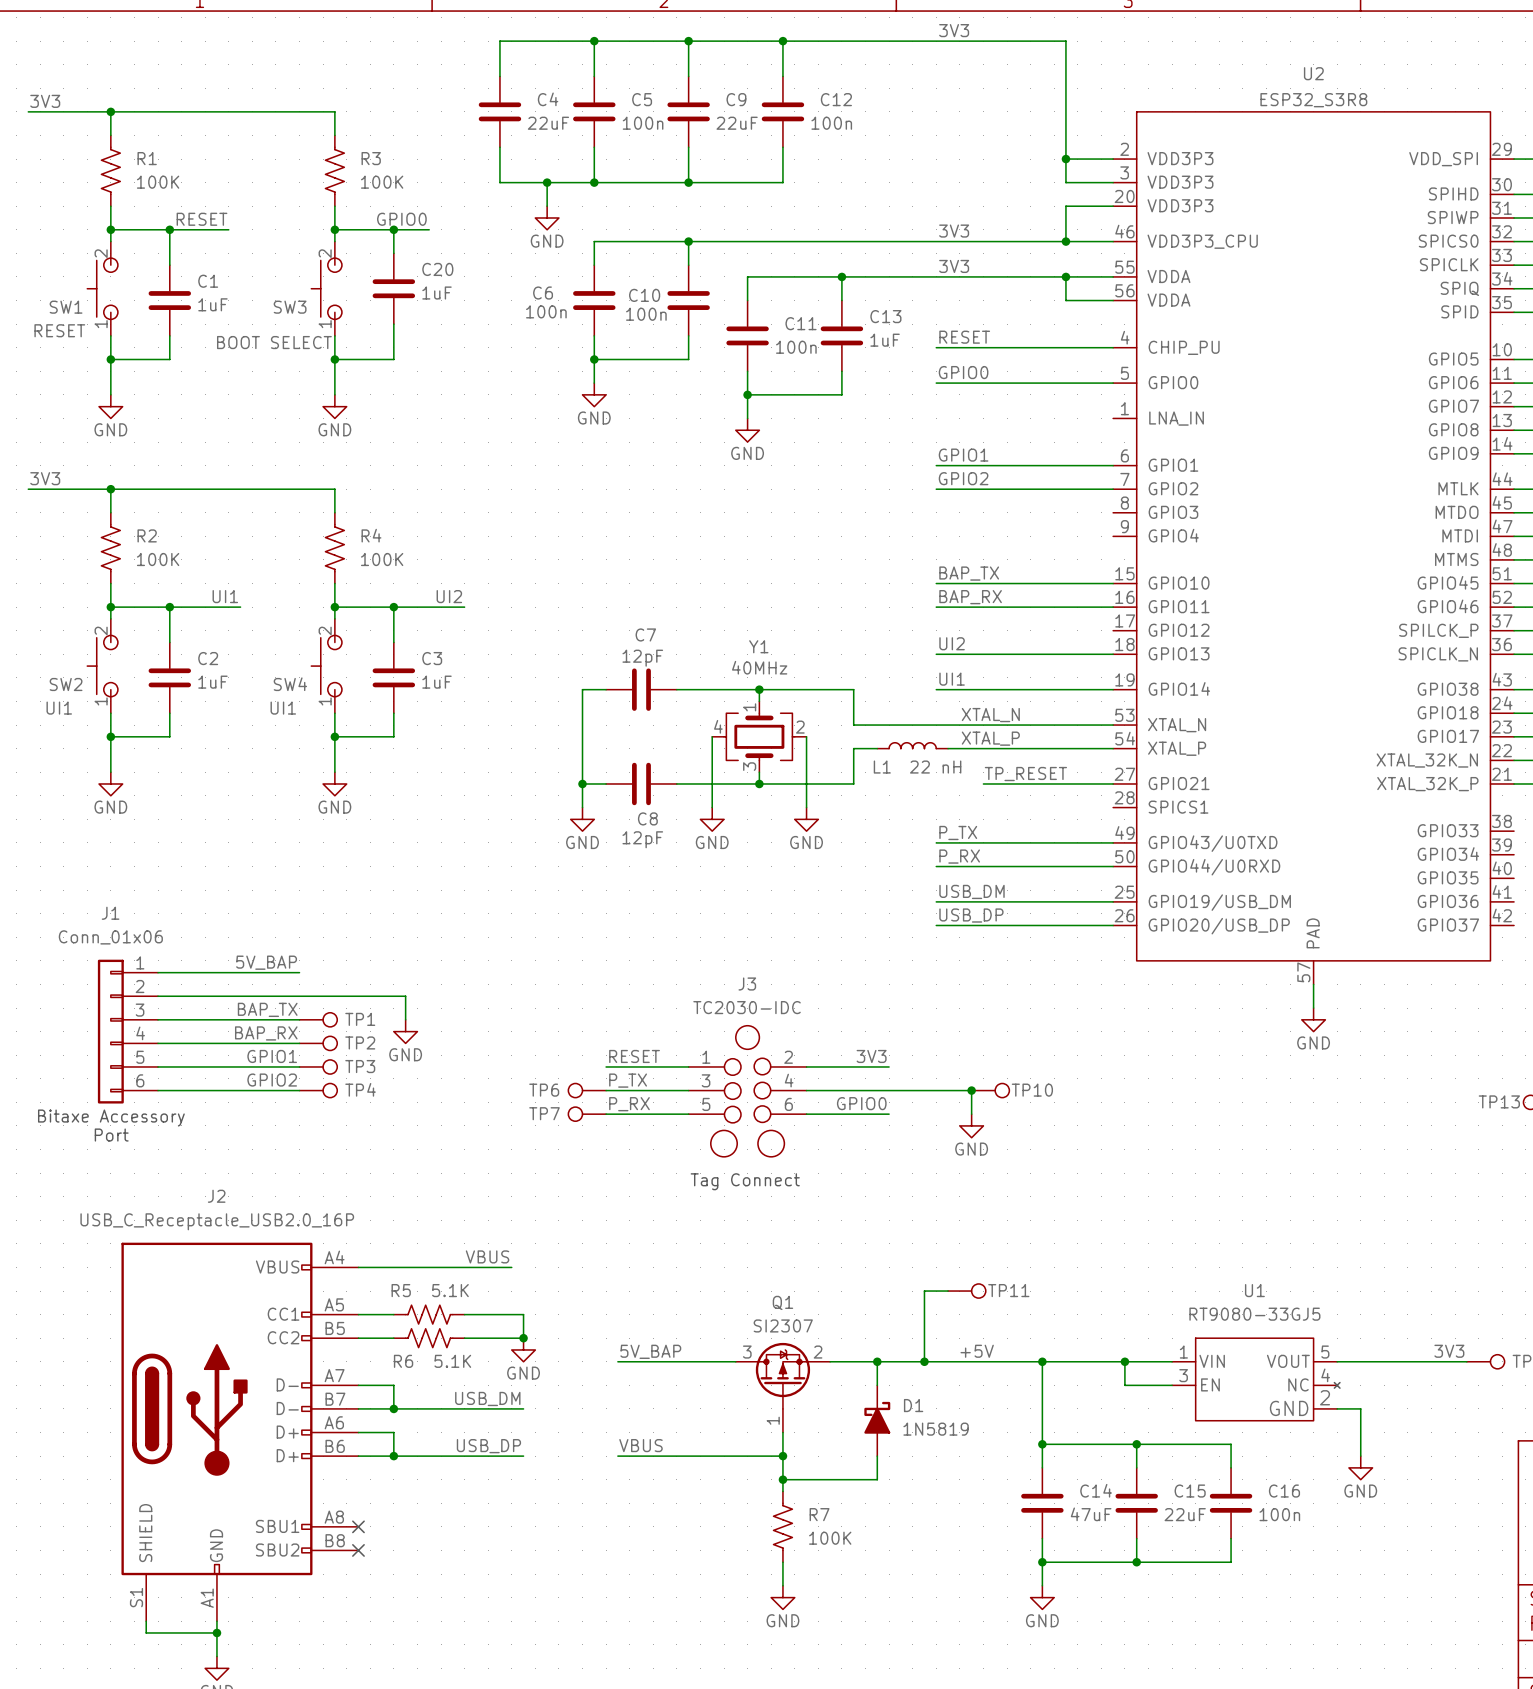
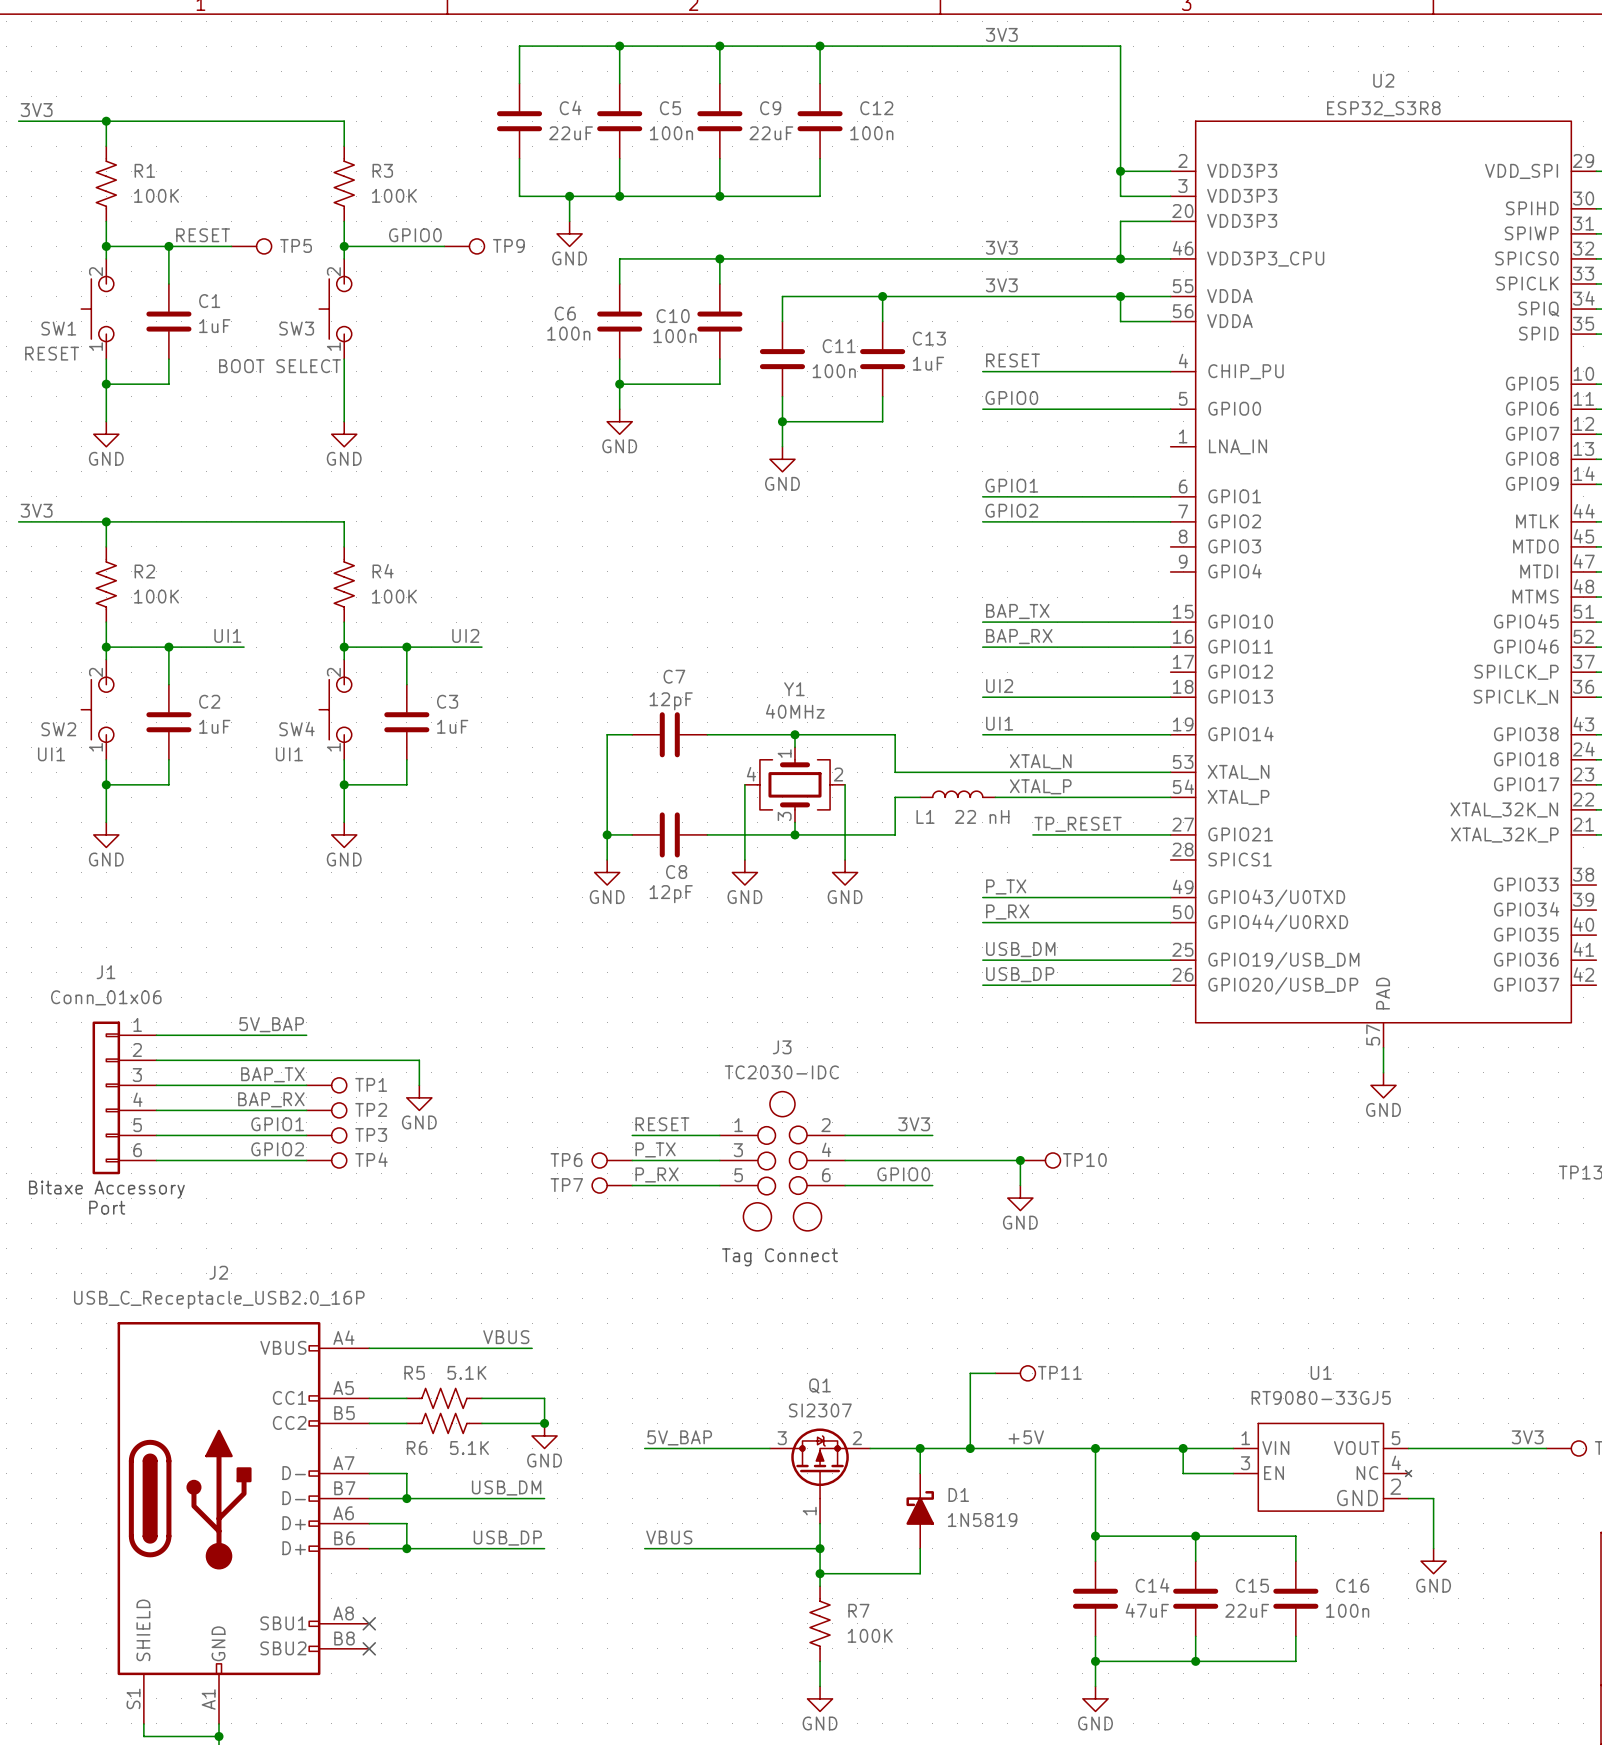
TP5: none -> (251, 246)
wire: (393, 229) (393, 253) -> none
junction: (393, 229) -> none
TP9: none -> (464, 246)
C20: 1uF (393, 288) -> none
wire: (393, 324) (393, 359) (334, 359) -> none
junction: (334, 359) -> none

